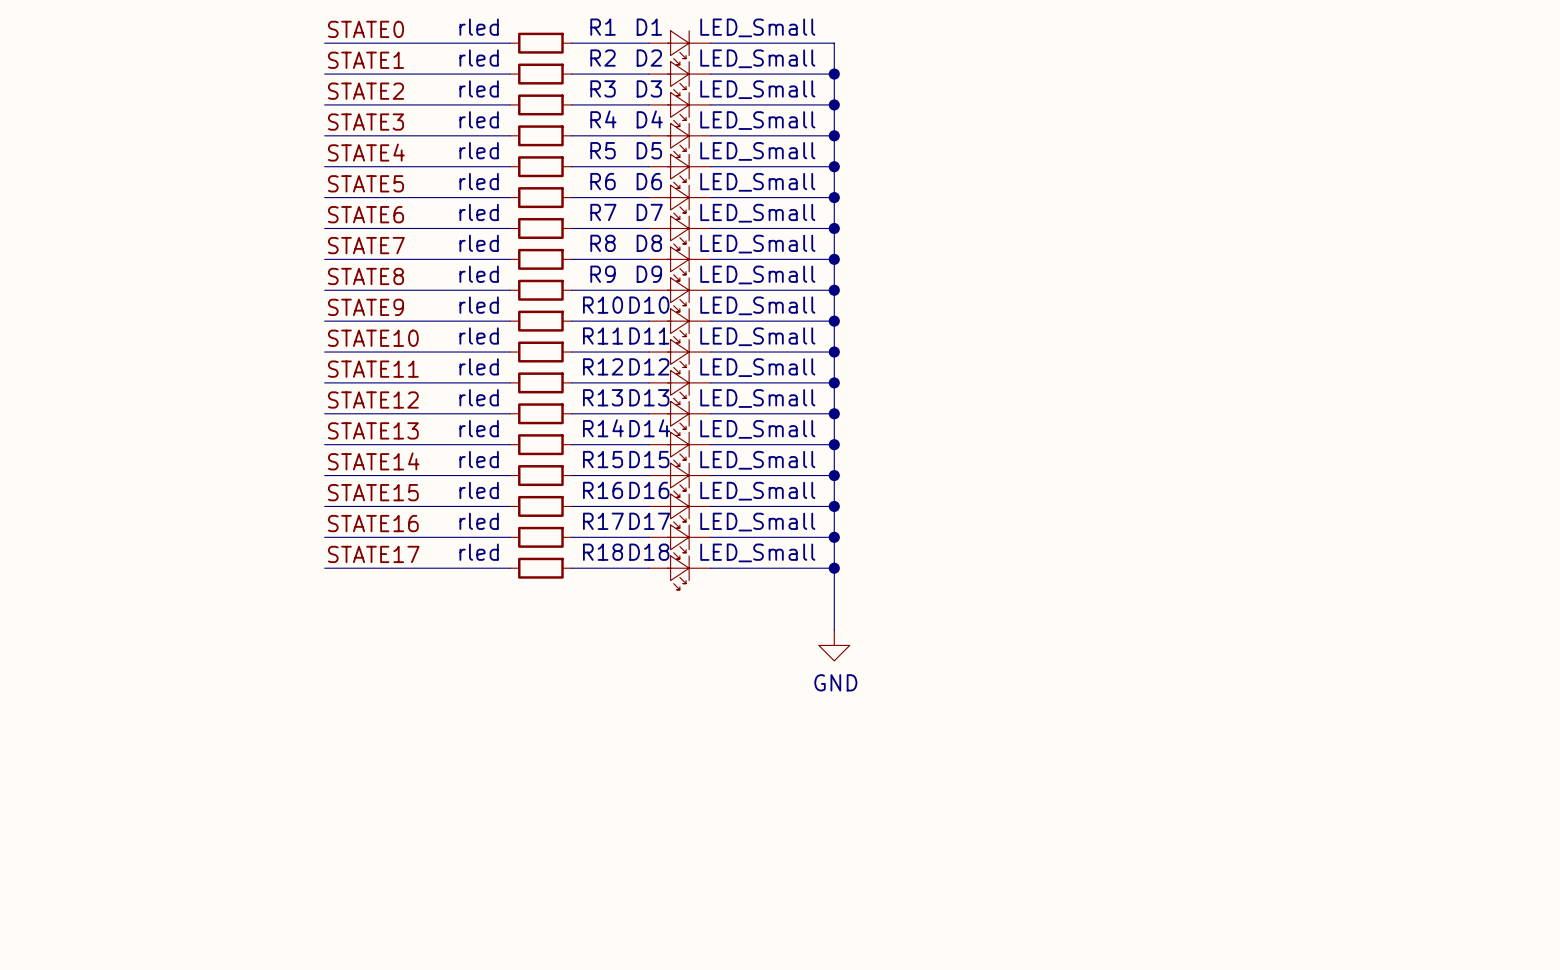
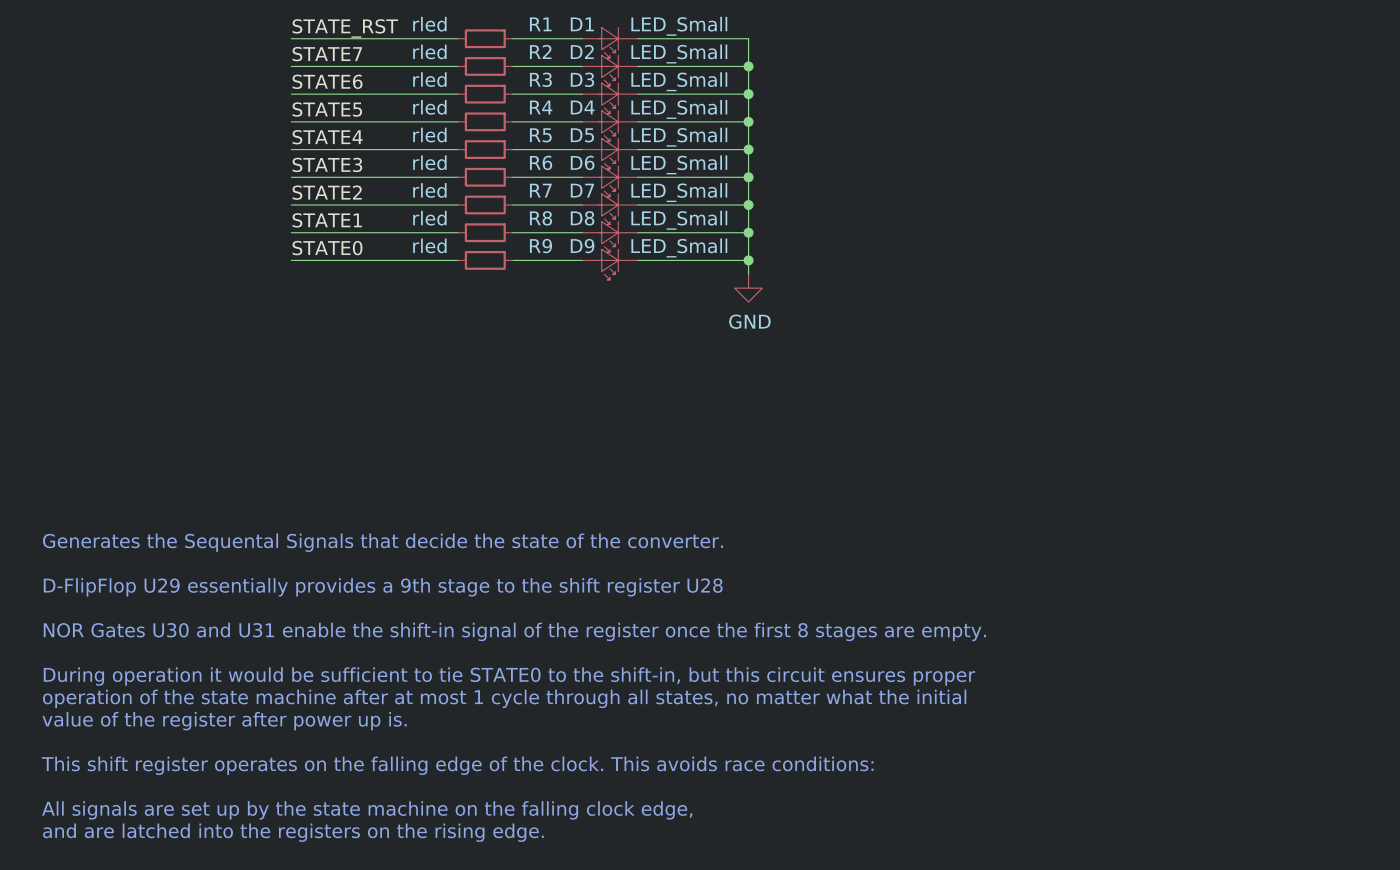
label: STATE0 (365, 29) -> STATE_RST (345, 28)
label: STATE1 (365, 60) -> STATE7 (327, 54)
label: STATE2 (365, 91) -> STATE6 (327, 81)
label: STATE3 (365, 122) -> STATE5 (327, 109)
label: STATE5 (365, 183) -> STATE3 (327, 164)
label: STATE6 (365, 214) -> STATE2 (327, 192)
label: STATE7 (366, 245) -> STATE1 (327, 220)
label: STATE8 (365, 276) -> STATE0 (327, 248)
wire: (834, 305) (834, 629) -> none
label: STATE9 (365, 307) -> none
wire: (324, 321) (510, 321) -> none
R10: rled (540, 321) -> none
wire: (571, 321) (648, 321) -> none
wire: (710, 321) (834, 321) -> none
junction: (834, 321) -> none
power symbol: none -> GND (748, 288)
D10: LED_Small (679, 325) -> none
label: STATE10 (373, 338) -> none
wire: (324, 352) (510, 352) -> none
R11: rled (540, 352) -> none
wire: (571, 352) (648, 352) -> none
wire: (710, 352) (834, 352) -> none
junction: (834, 352) -> none
D11: LED_Small (679, 356) -> none
label: STATE11 (373, 369) -> none
wire: (324, 382) (510, 382) -> none
R12: rled (540, 382) -> none
wire: (571, 382) (648, 382) -> none
wire: (710, 382) (834, 382) -> none
junction: (834, 382) -> none
D12: LED_Small (679, 387) -> none
label: STATE12 (373, 400) -> none
wire: (324, 413) (510, 413) -> none
R13: rled (540, 413) -> none
wire: (571, 413) (648, 413) -> none
wire: (710, 413) (834, 413) -> none
junction: (834, 413) -> none
D13: LED_Small (679, 418) -> none
label: STATE13 (373, 430) -> none
wire: (324, 444) (510, 444) -> none
R14: rled (540, 444) -> none
wire: (571, 444) (648, 444) -> none
wire: (710, 444) (834, 444) -> none
junction: (834, 444) -> none
D14: LED_Small (679, 449) -> none
label: STATE14 (373, 461) -> none
wire: (324, 475) (510, 475) -> none
R15: rled (540, 475) -> none
wire: (571, 475) (648, 475) -> none
wire: (710, 475) (834, 475) -> none
junction: (834, 475) -> none
D15: LED_Small (679, 480) -> none
label: STATE15 (373, 492) -> none
wire: (324, 506) (510, 506) -> none
R16: rled (540, 506) -> none
wire: (571, 506) (648, 506) -> none
wire: (710, 506) (834, 506) -> none
junction: (834, 506) -> none
D16: LED_Small (679, 511) -> none
label: STATE16 (373, 523) -> none
wire: (324, 537) (510, 537) -> none
R17: rled (540, 537) -> none
wire: (571, 537) (648, 537) -> none
wire: (710, 537) (834, 537) -> none
junction: (834, 537) -> none
D17: LED_Small (679, 541) -> none
label: STATE17 (373, 554) -> none
wire: (324, 568) (510, 568) -> none
R18: rled (540, 568) -> none
wire: (571, 568) (648, 568) -> none
wire: (710, 568) (834, 568) -> none
junction: (834, 568) -> none
D18: LED_Small (679, 572) -> none
text: none -> Generates the Sequental Signals that decide the state of the converter. (382, 542)
power symbol: GND (834, 645) -> none
text: none -> D-FlipFlop U29 essentially provides a 9th stage to the shift register U28 (383, 587)
text: none -> NOR Gates U30 and U31 enable the shift-in signal of the register once the first 8 stages are empty. (514, 631)
text: none -> During operation it would be sufficient to tie STATE0 to the shift-in, but this circuit ensures proper (509, 676)
text: none -> operation of the state machine after at most 1 cycle through all states, no matter what the initial (504, 698)
text: none -> value of the register after power up is. (224, 721)
text: none -> This shift register operates on the falling edge of the clock. This avoids race conditions: (457, 765)
text: none -> All signals are set up by the state machine on the falling clock edge, (367, 810)
text: none -> and are latched into the registers on the rising edge. (293, 832)

